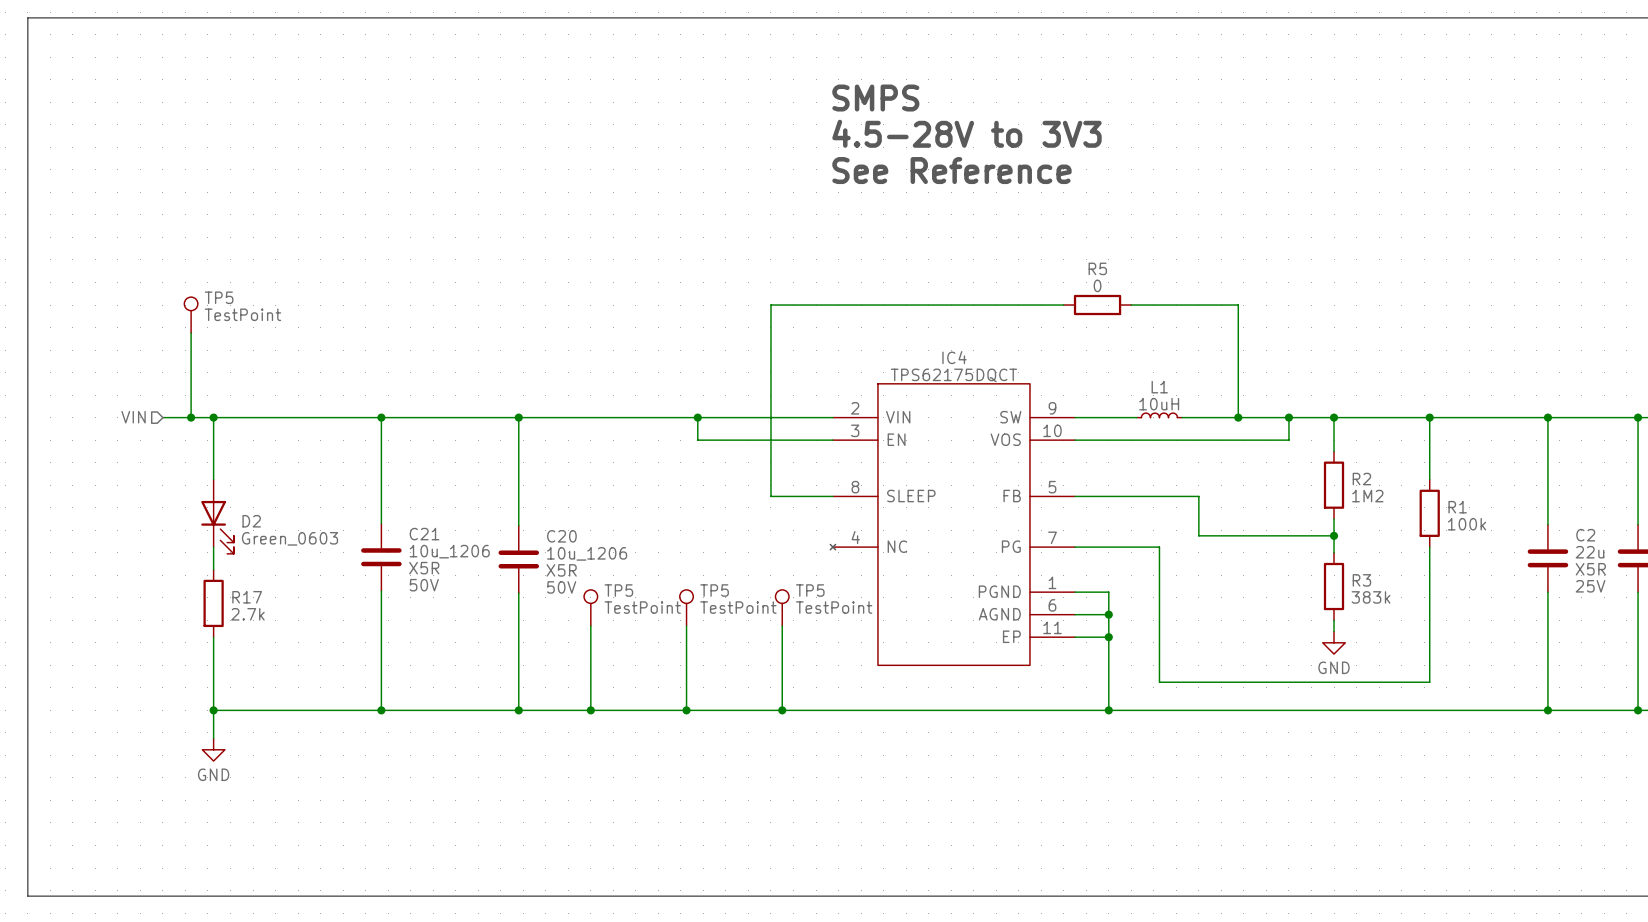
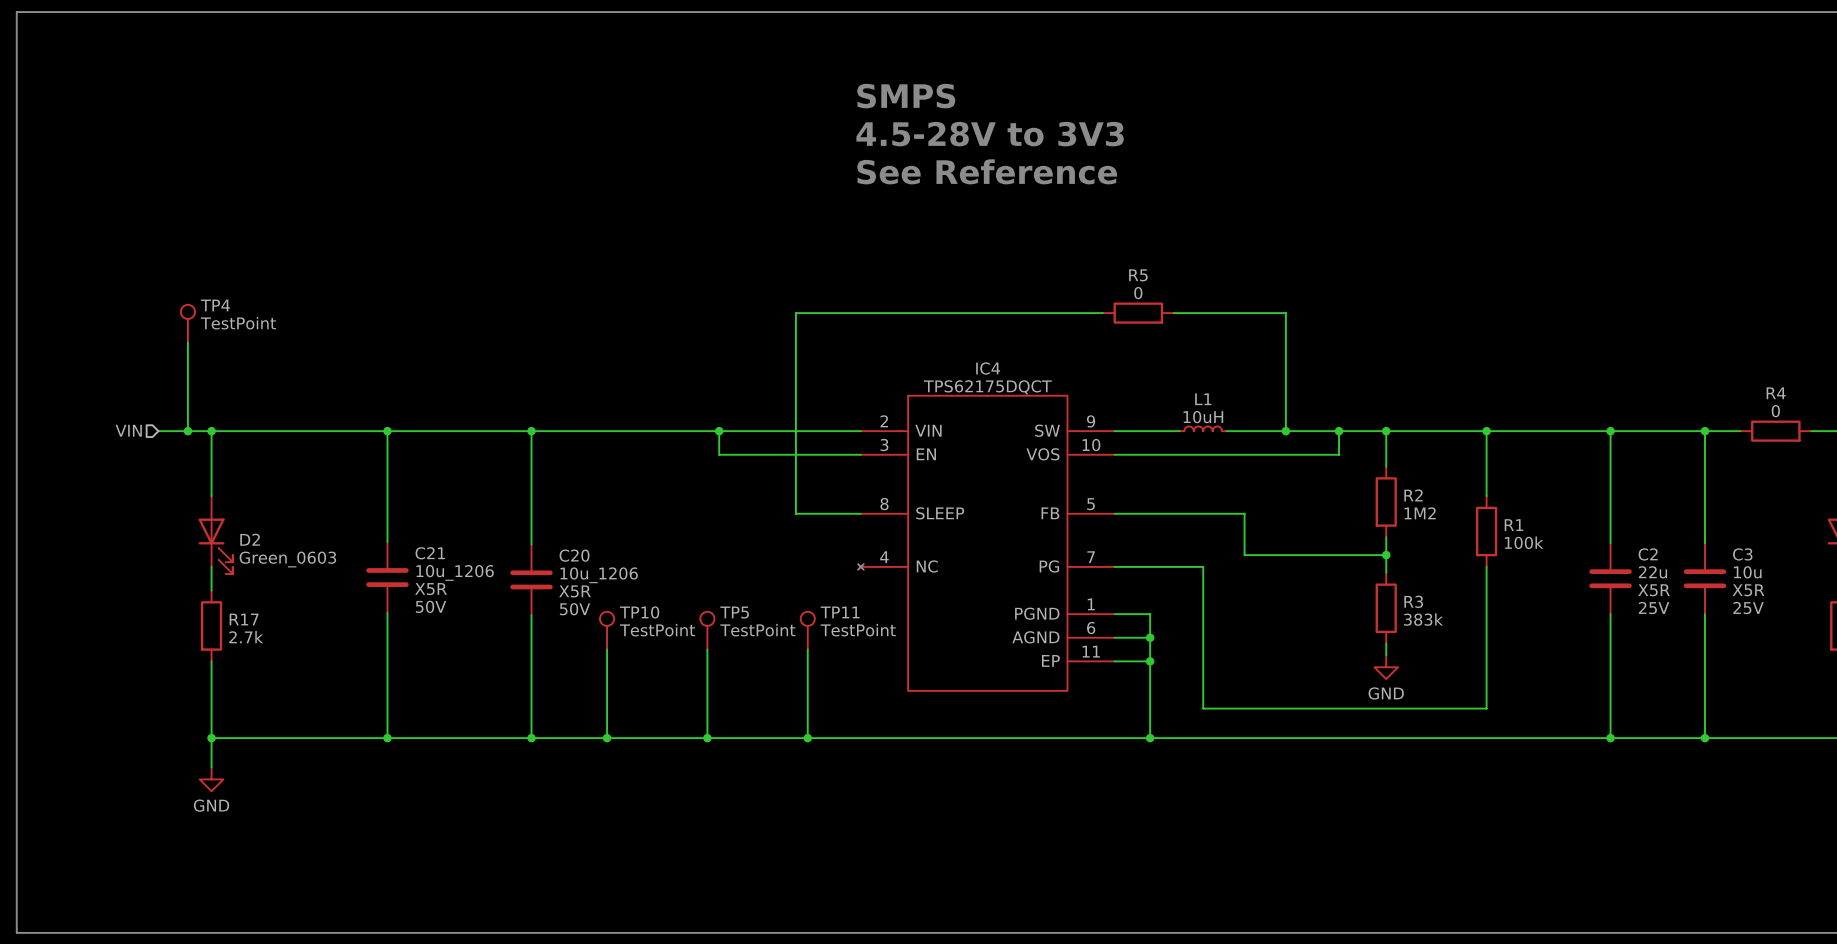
TP5 name: TP5 (219, 297) -> TP4 (215, 305)
TP5 name: TP5 (618, 590) -> TP10 (639, 612)
TP5 name: TP5 (810, 590) -> TP11 (840, 612)

